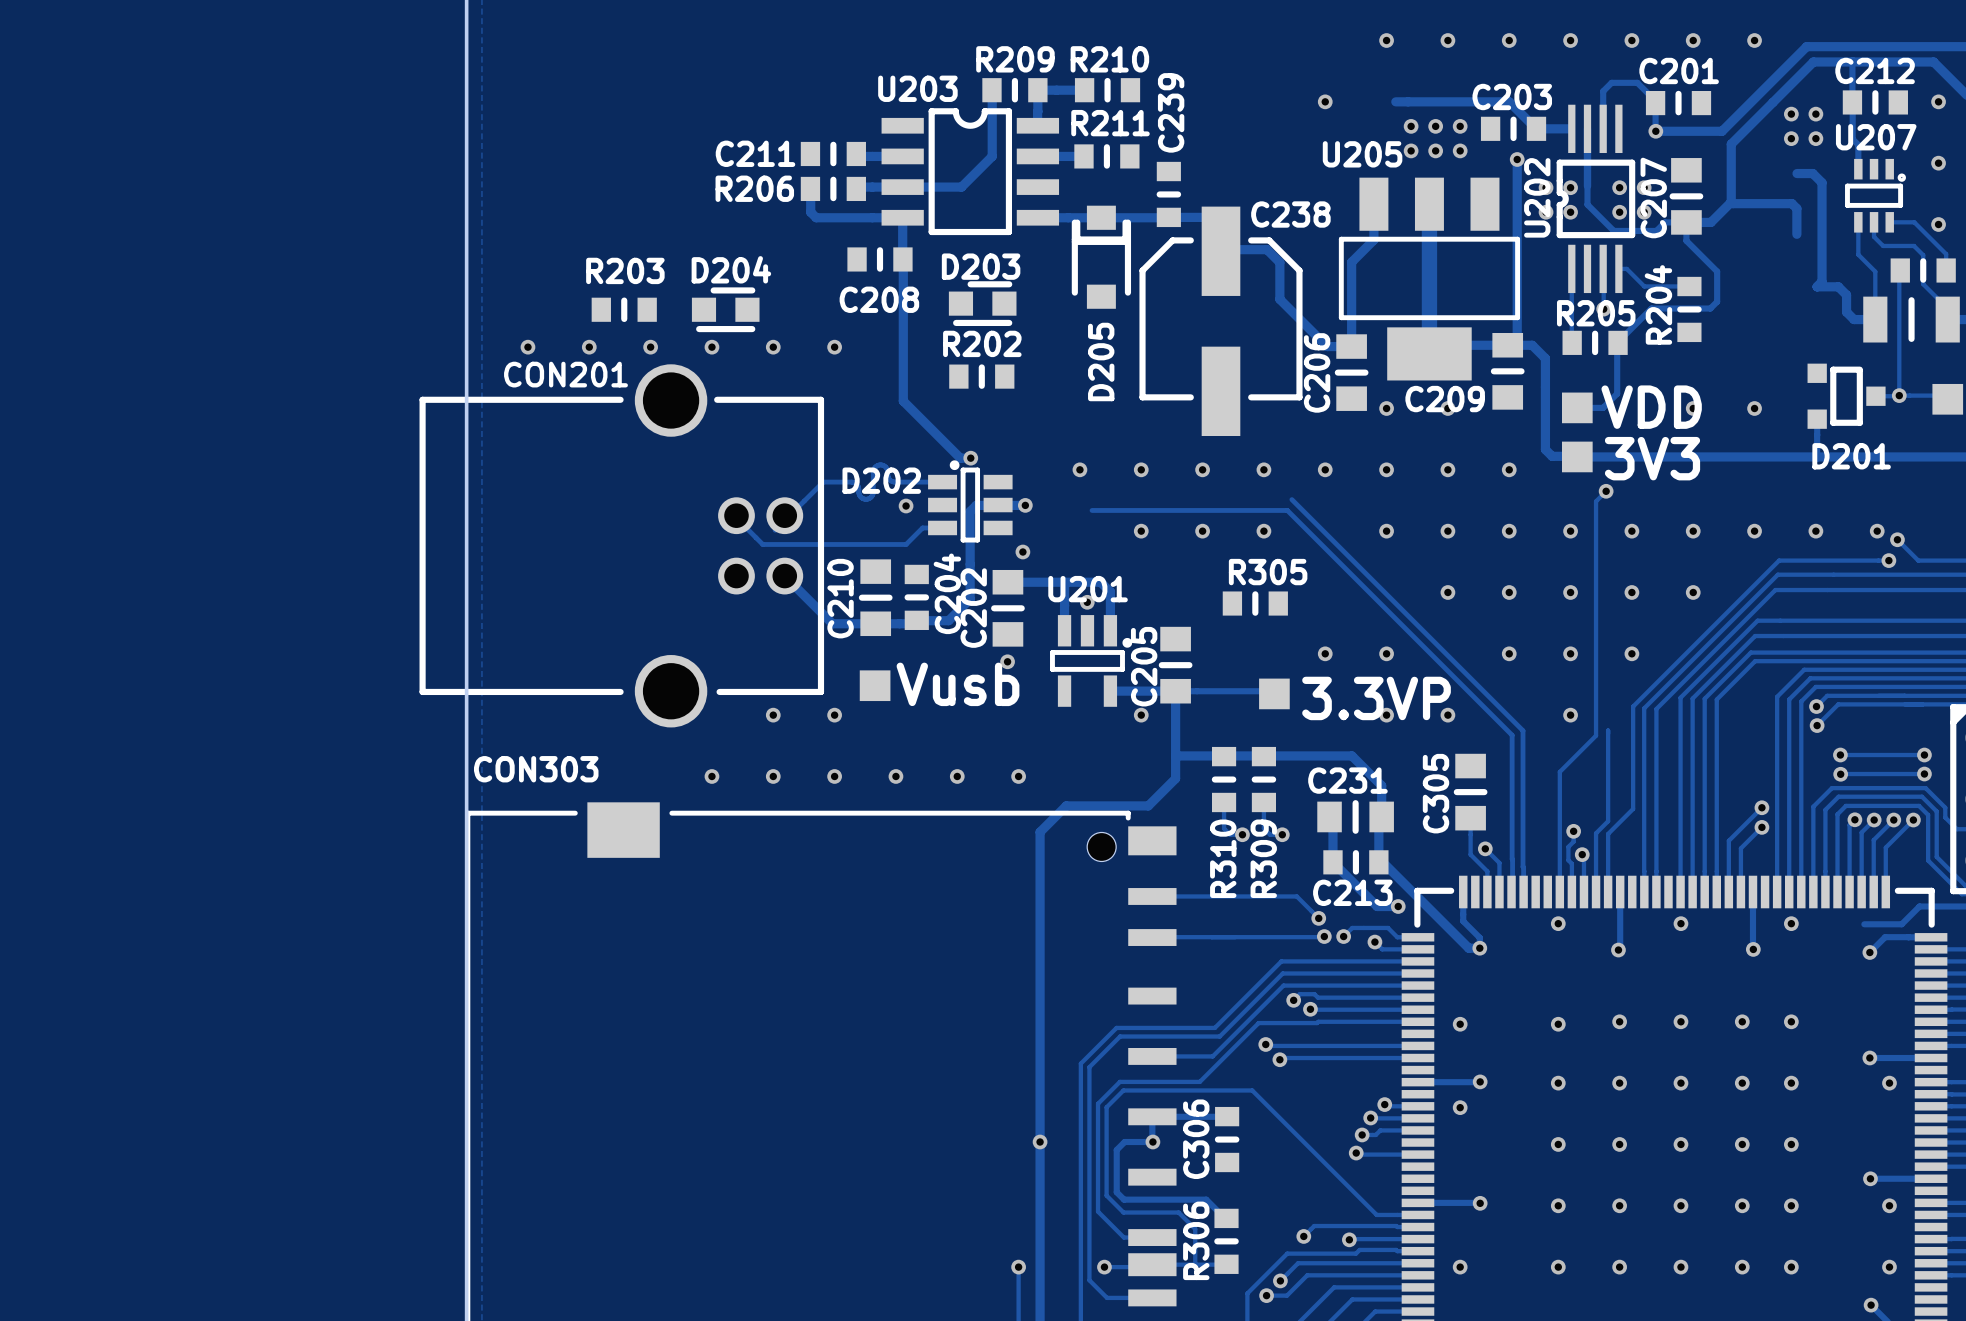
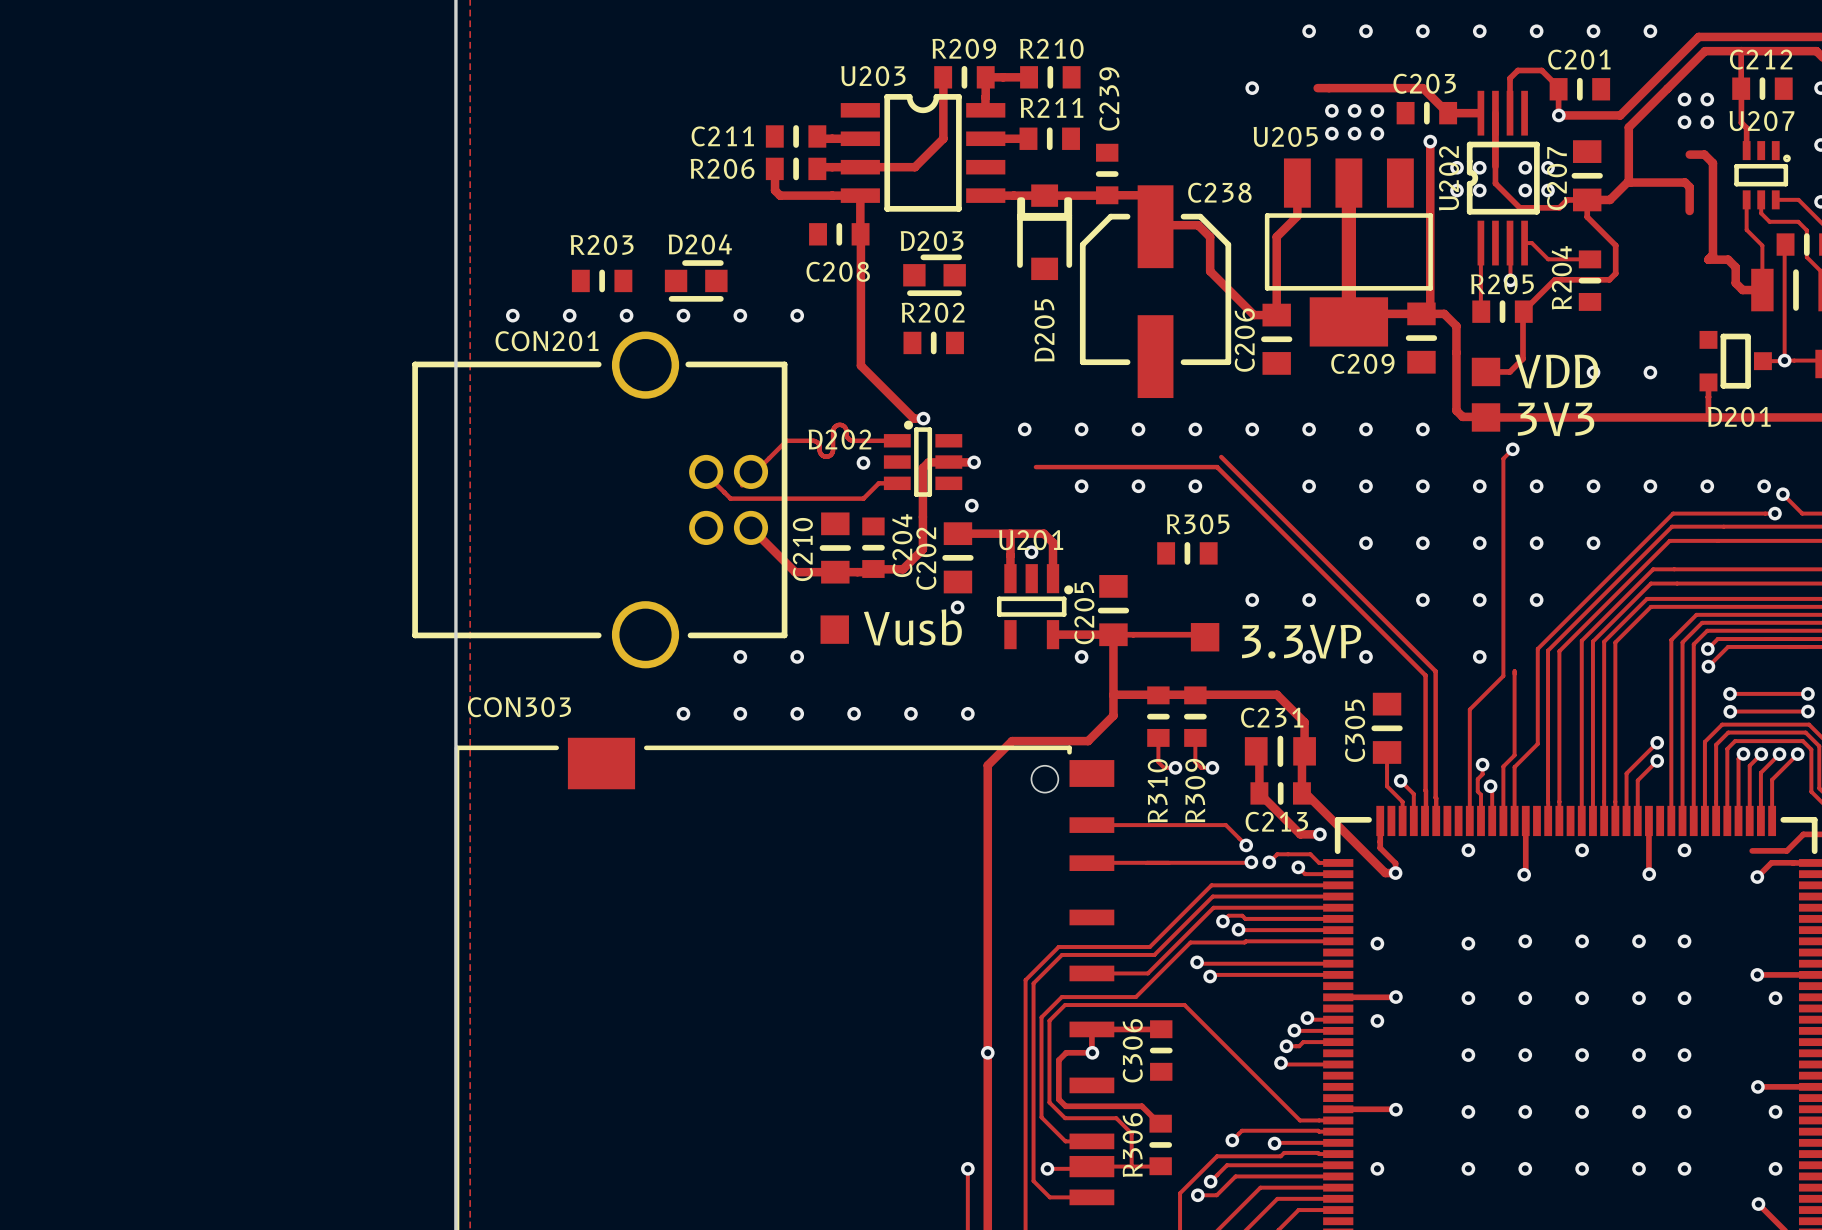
via: (1386, 408) -> none
via: (1447, 408) -> none

